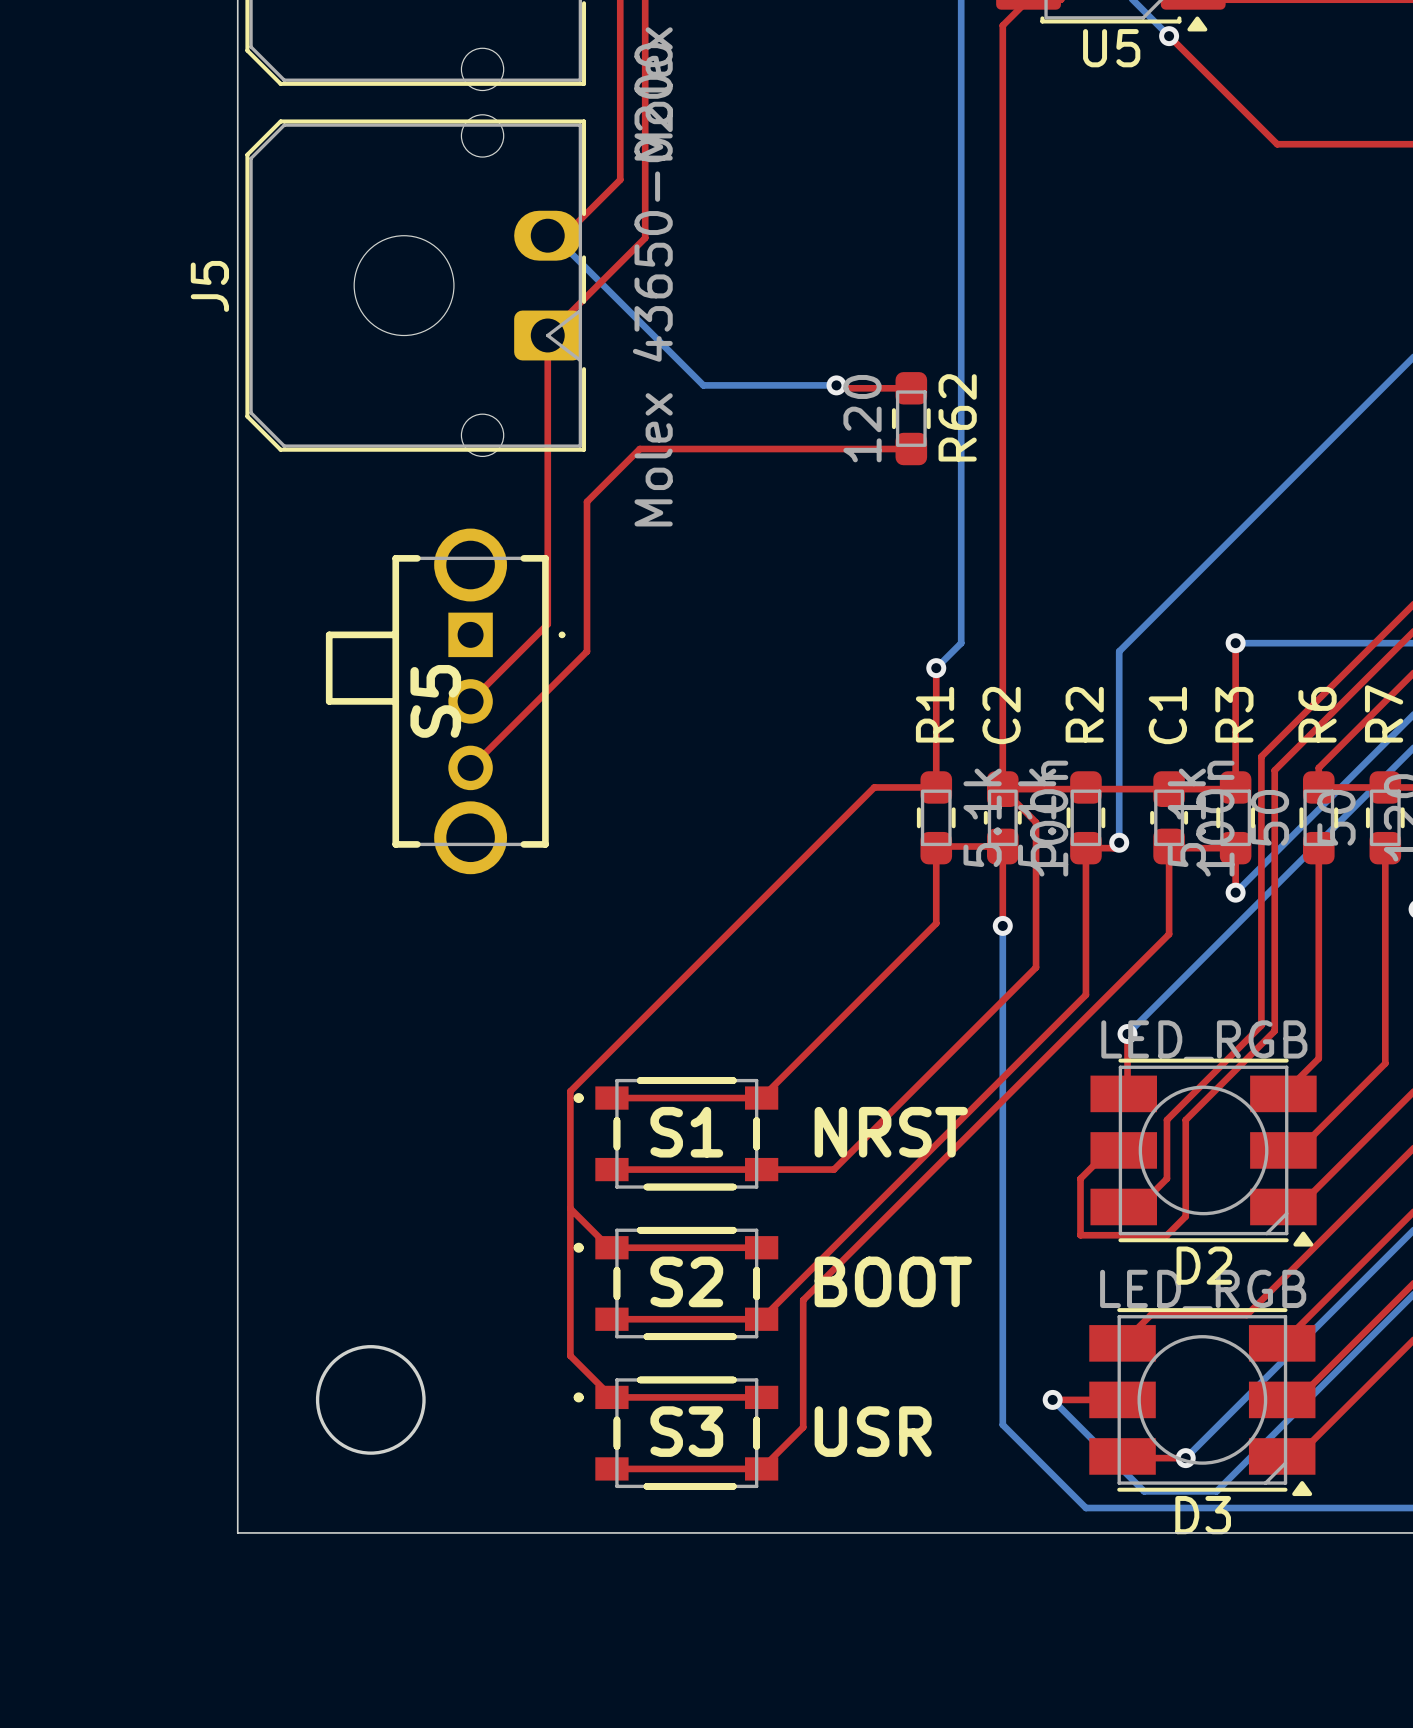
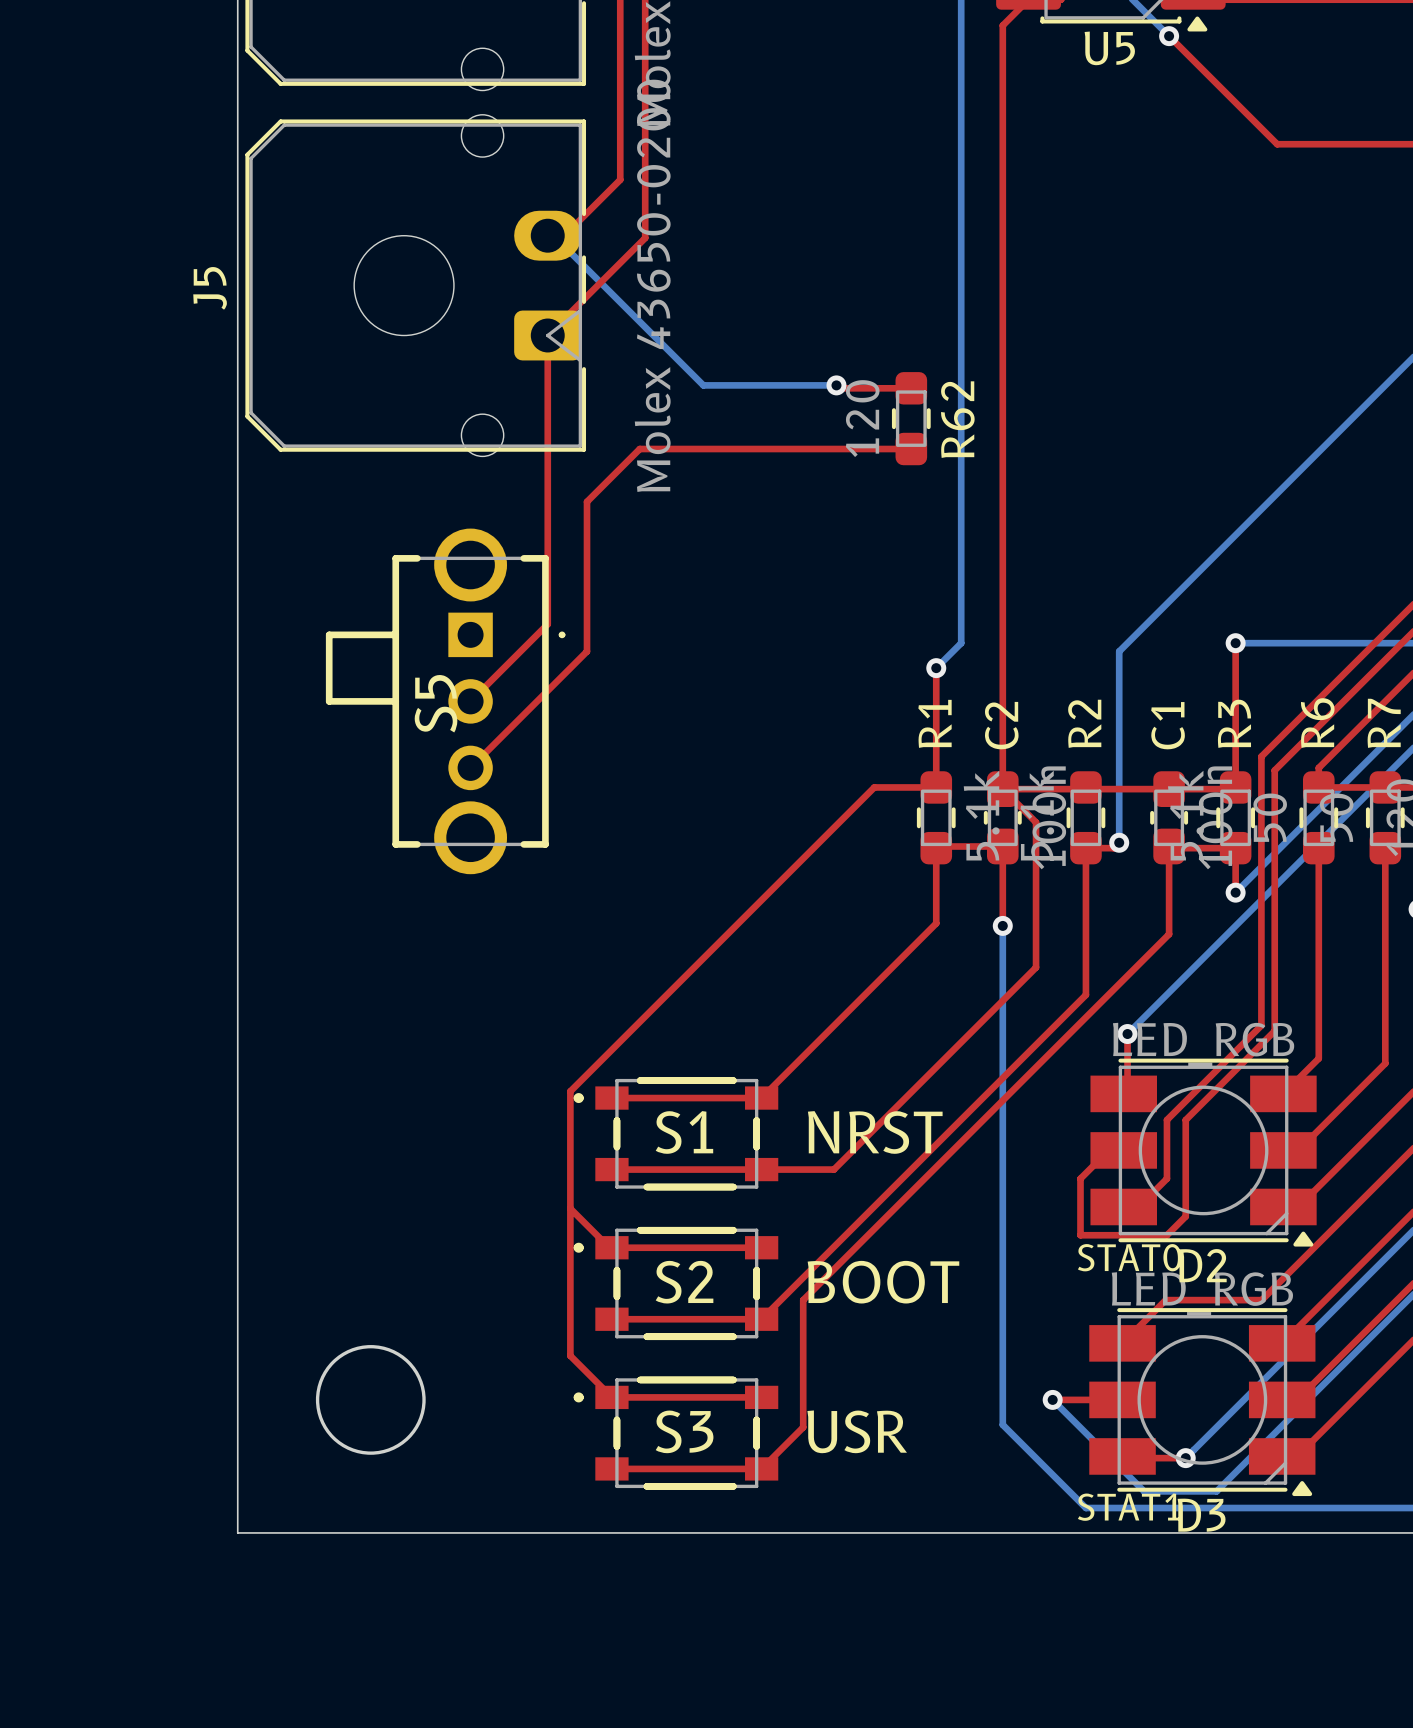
text: none -> STAT0 (1129, 1257)
top track: (1261, 1300) (1246, 1315) (1150, 1315) -> (1261, 1300) (1165, 1300) (1150, 1315)
text: none -> STAT1 (1129, 1507)

